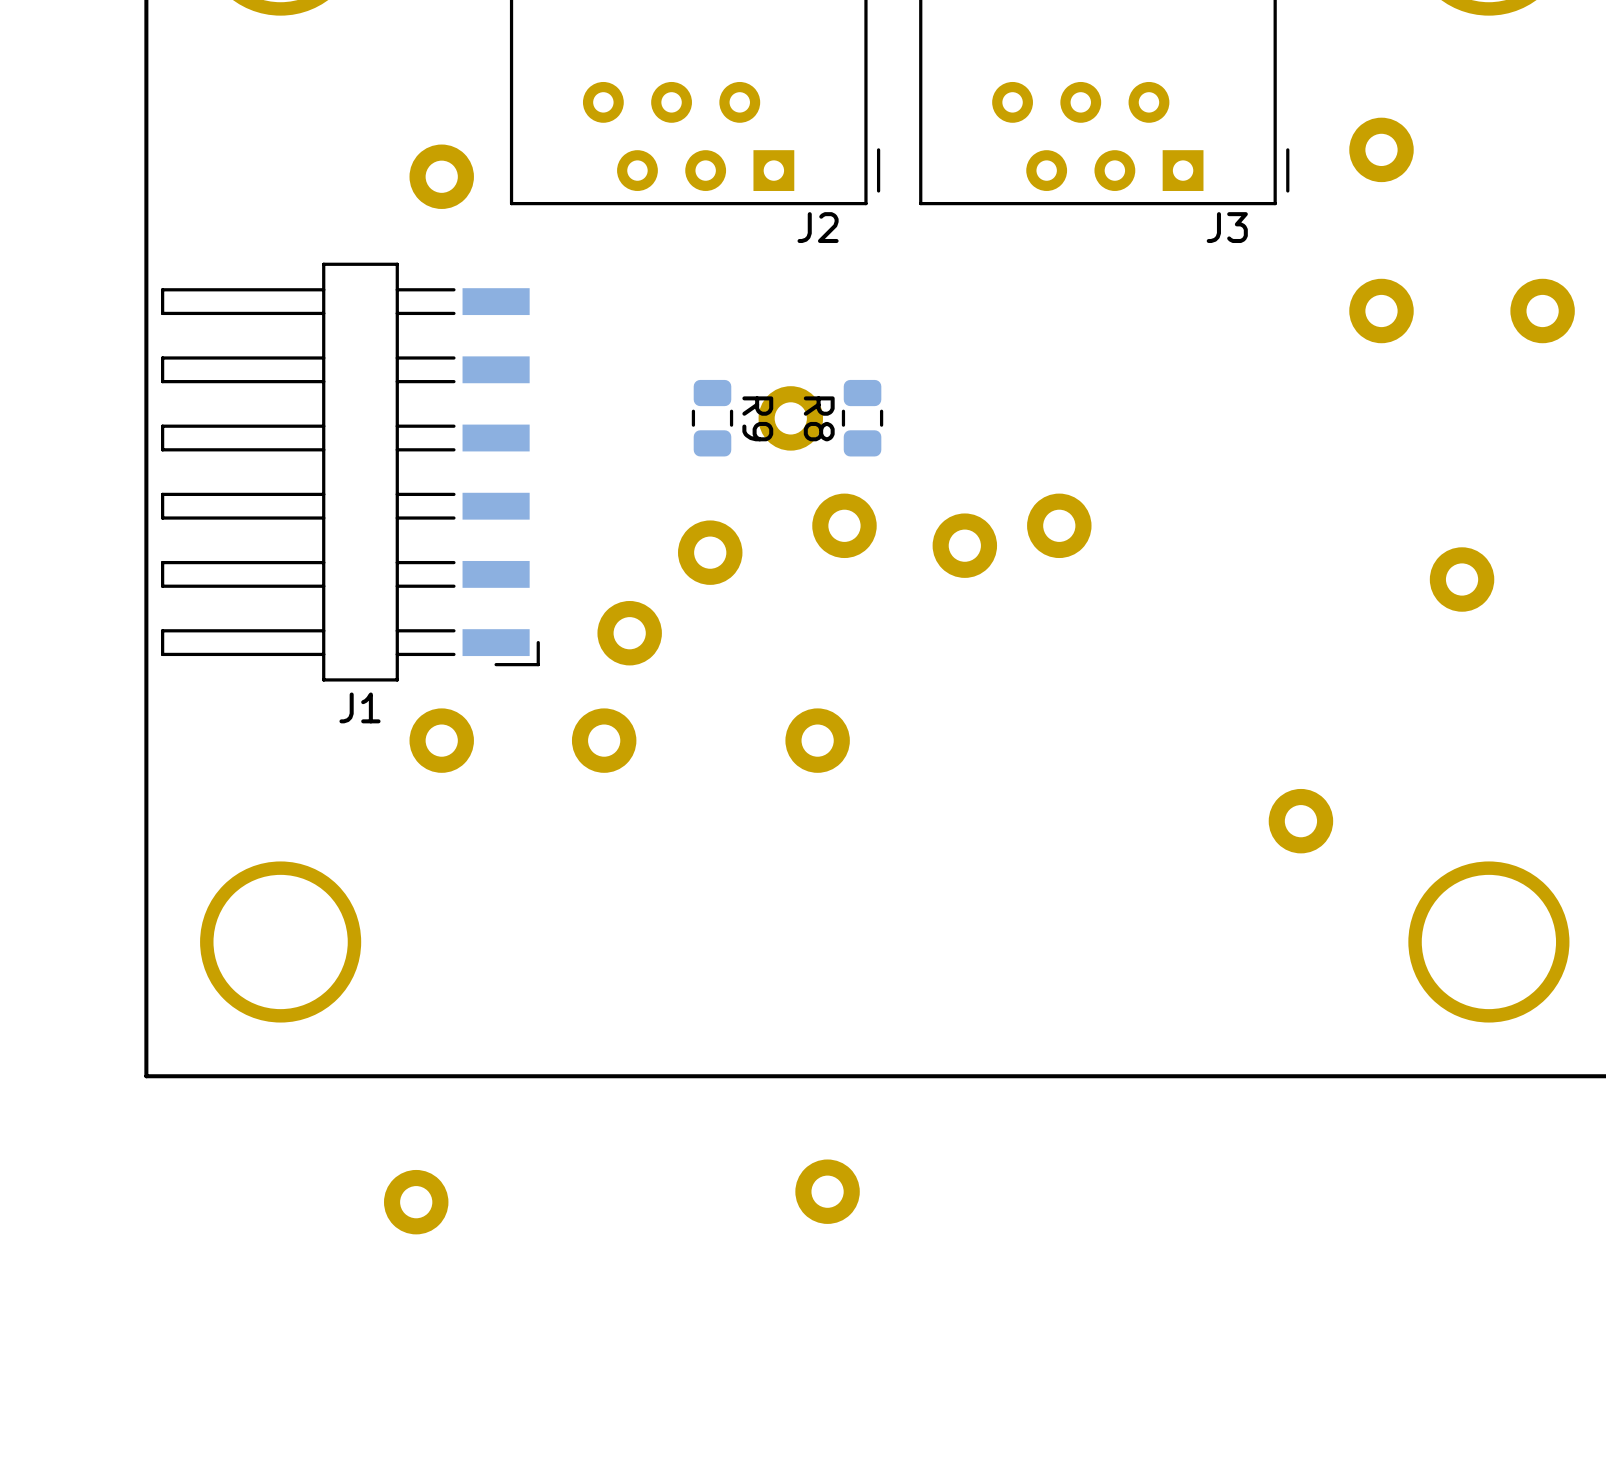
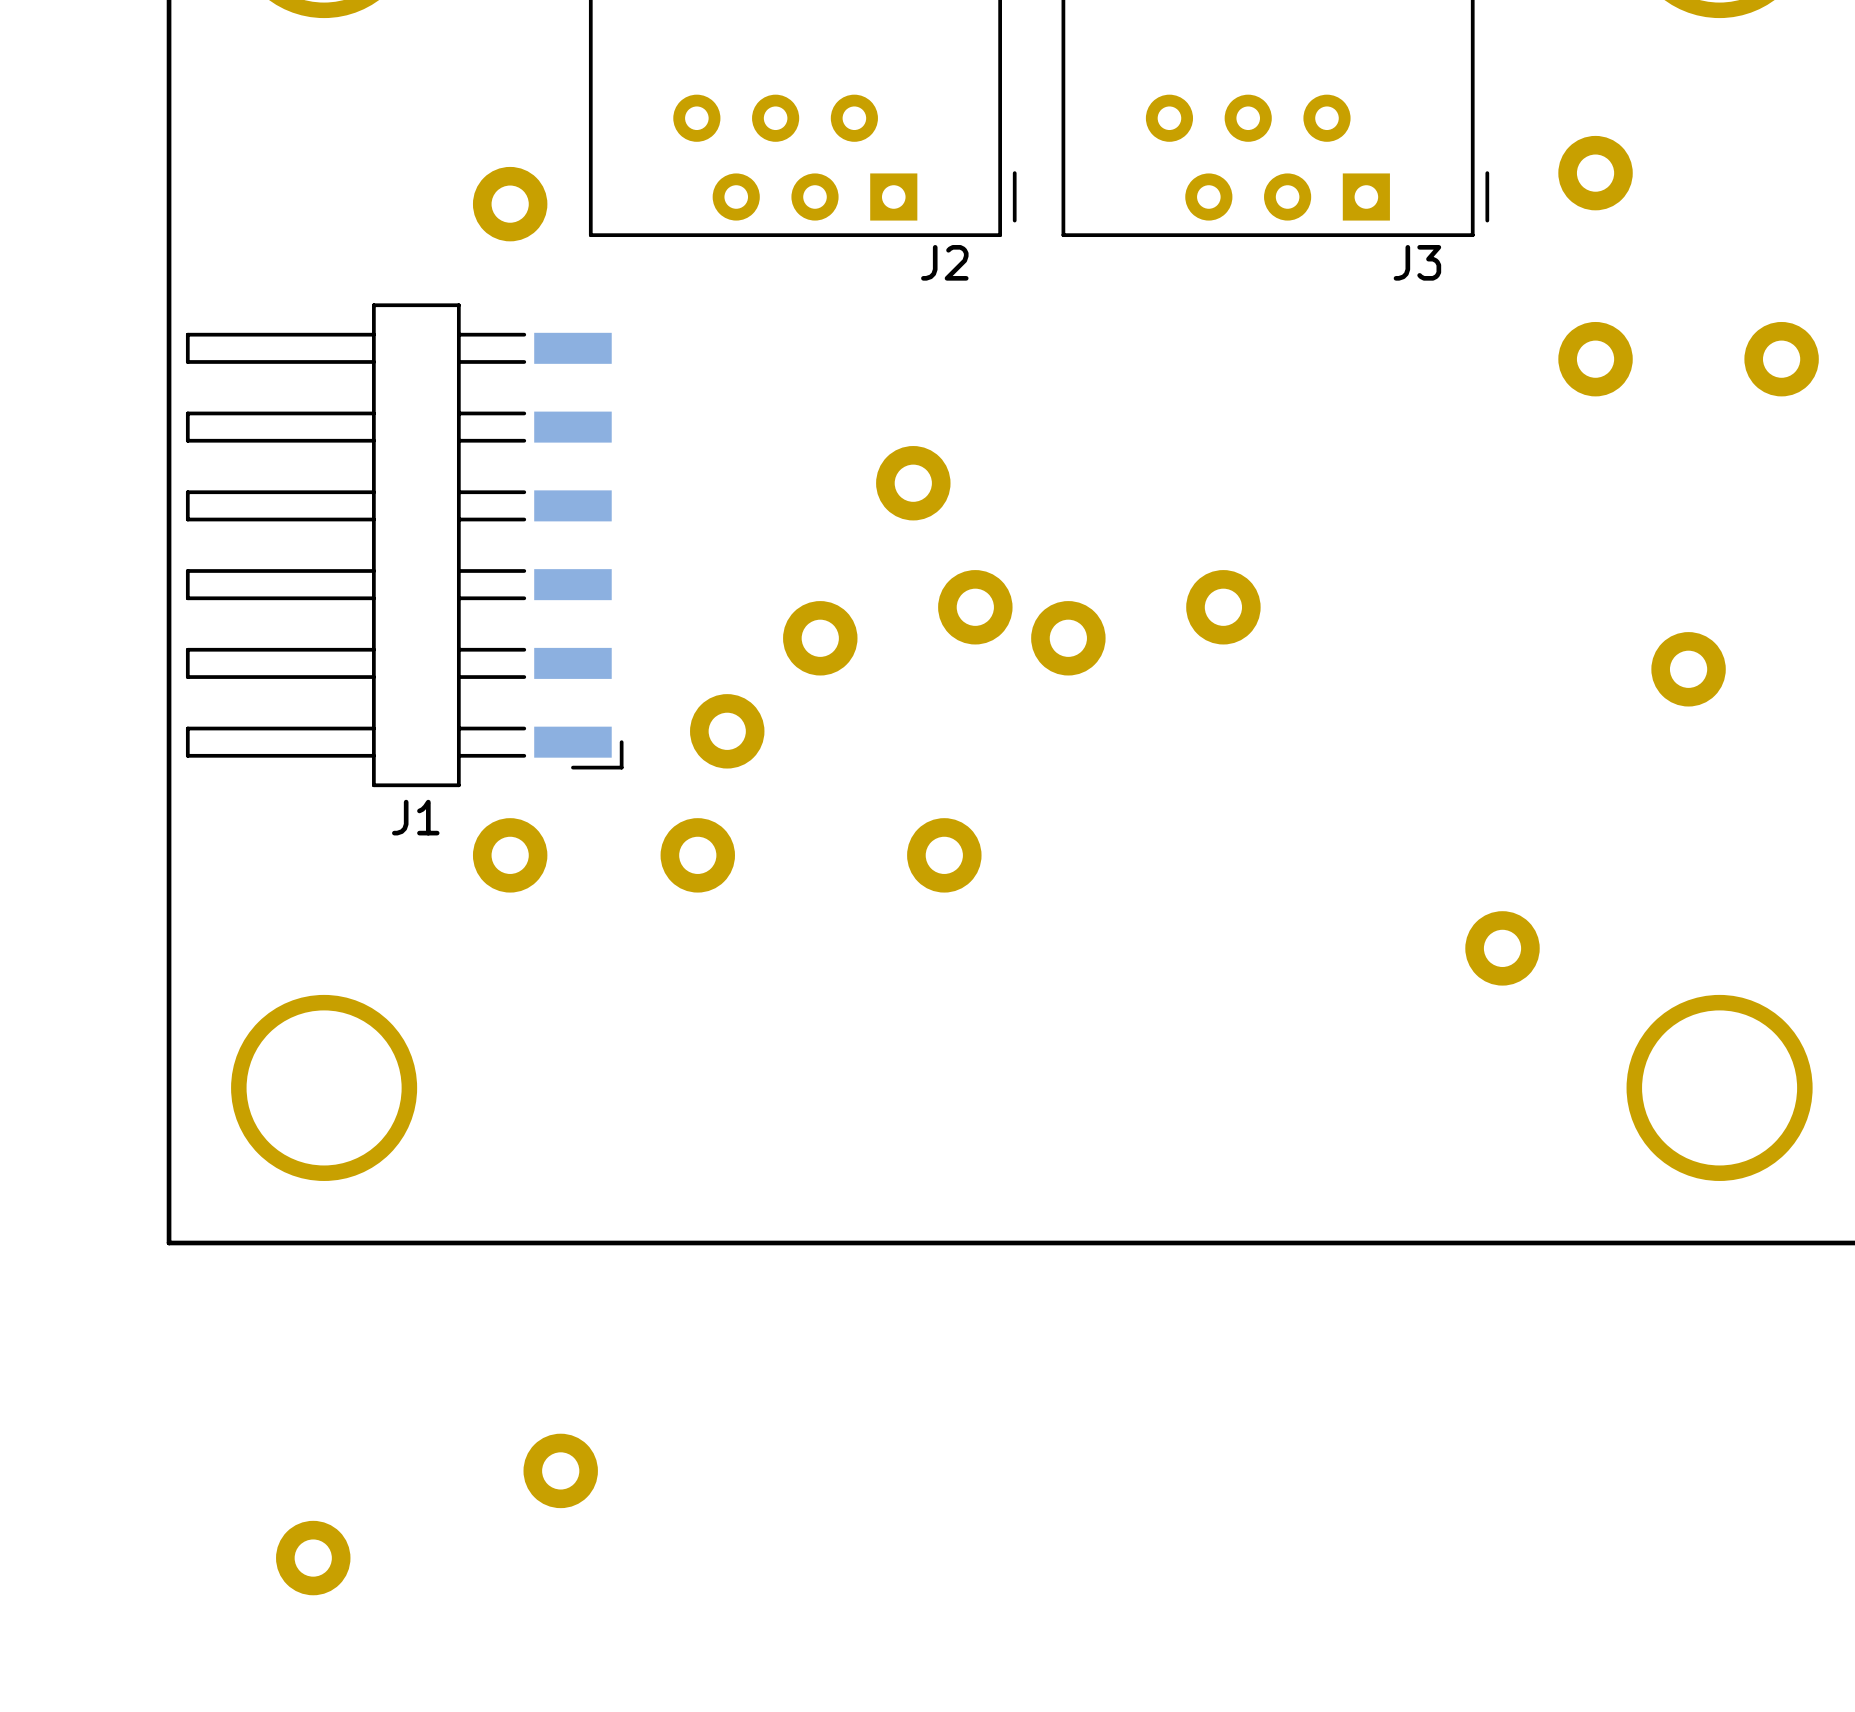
R9: (712, 418) -> none
R8: (862, 418) -> none
part position: (964, 545) -> (1068, 638)
part: (827, 1191) -> none
part position: (416, 1202) -> (560, 1470)
part: none -> (313, 1558)

